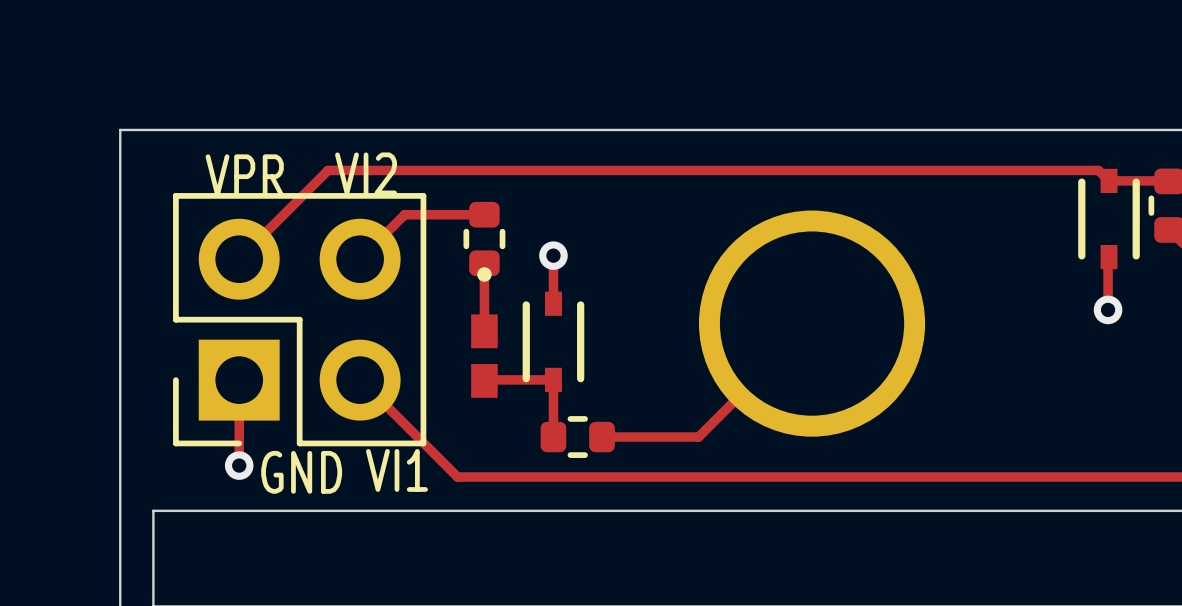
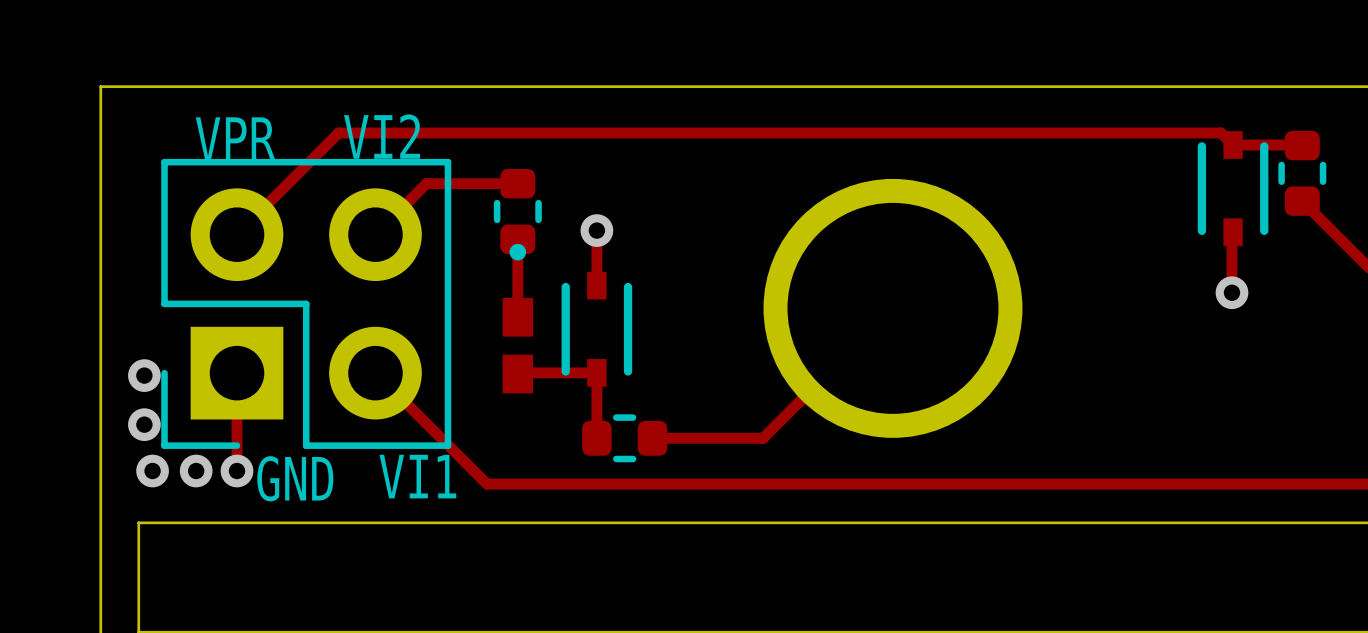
via: none -> (144, 375)
via: none -> (144, 424)
via: none -> (152, 471)
via: none -> (196, 471)

